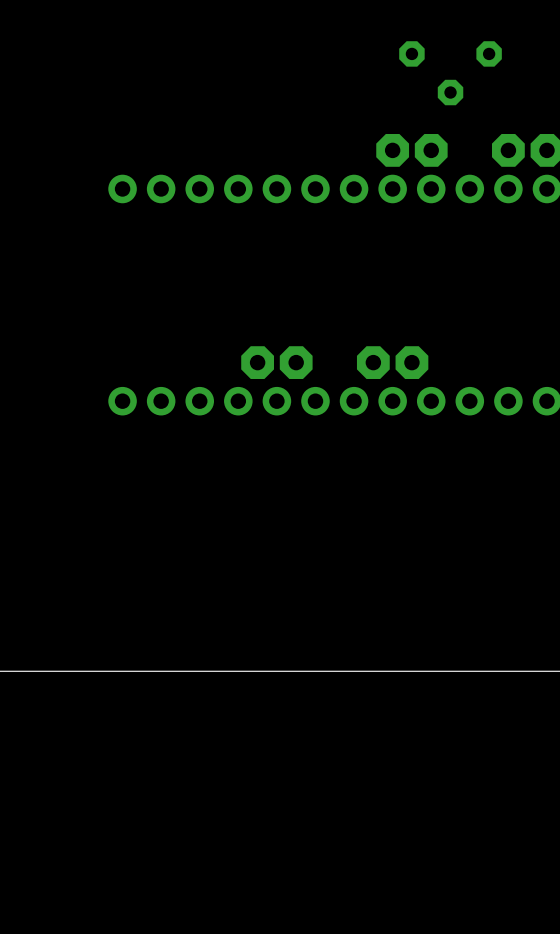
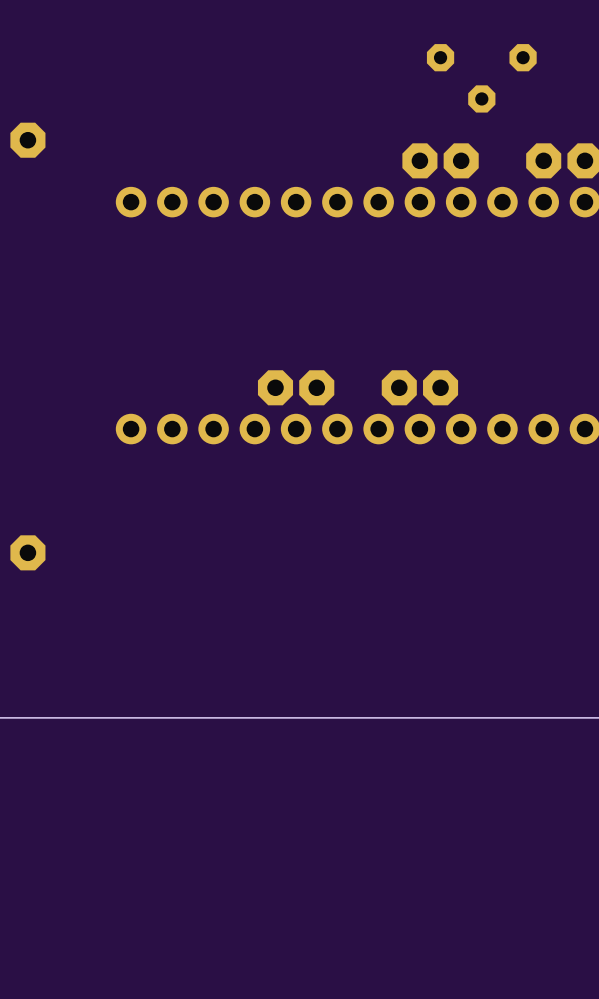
part: none -> (27, 140)
part: none -> (27, 552)

